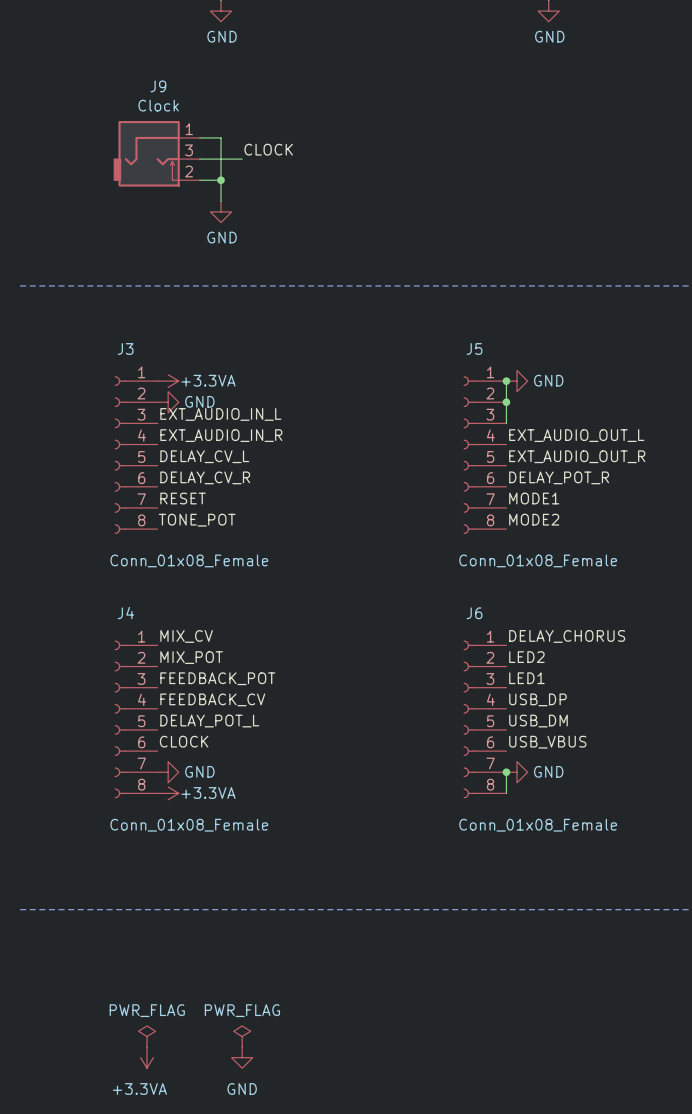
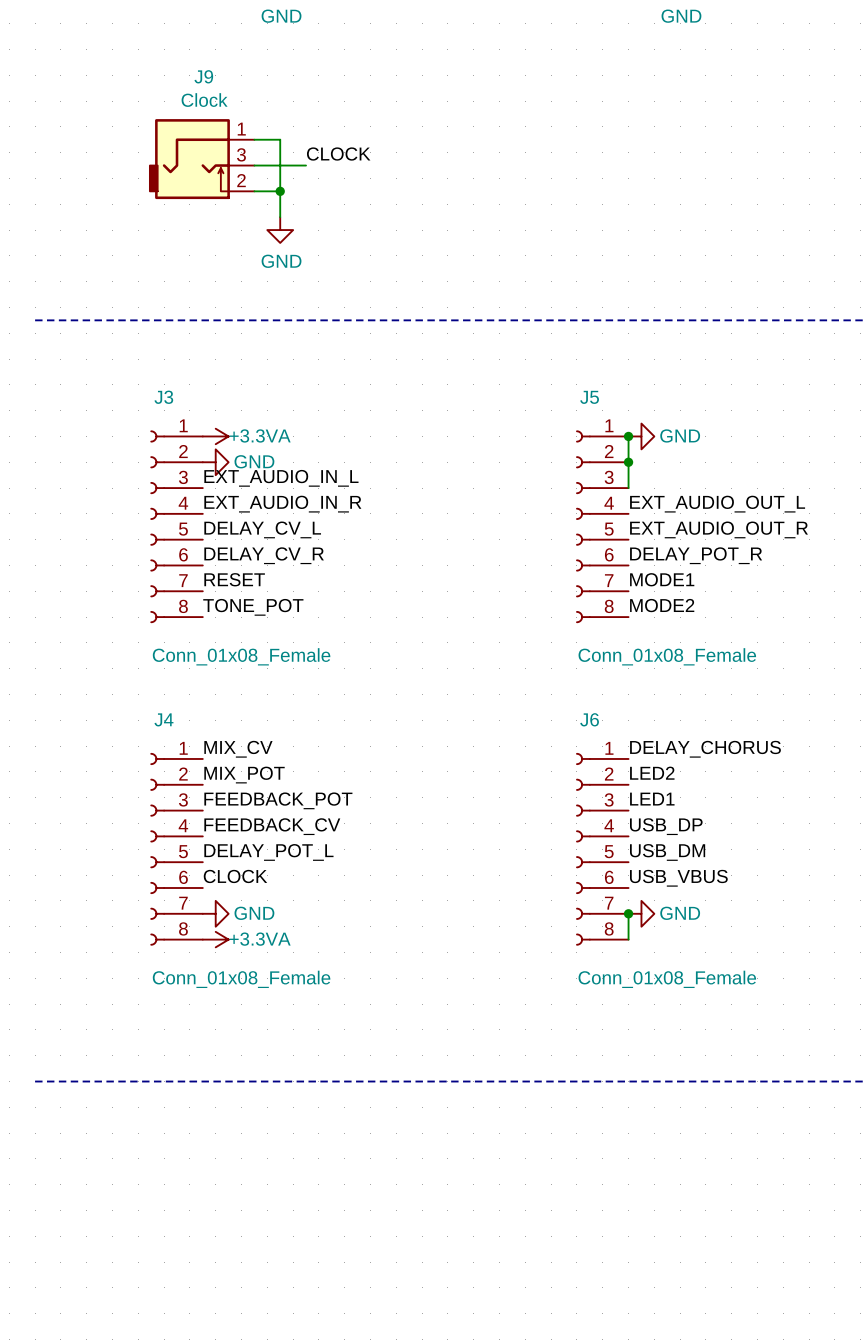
power symbol: PWR_FLAG (147, 1036) -> none
power symbol: PWR_FLAG (242, 1036) -> none
power symbol: +3.3VA (147, 1057) -> none
power symbol: GND (242, 1057) -> none

